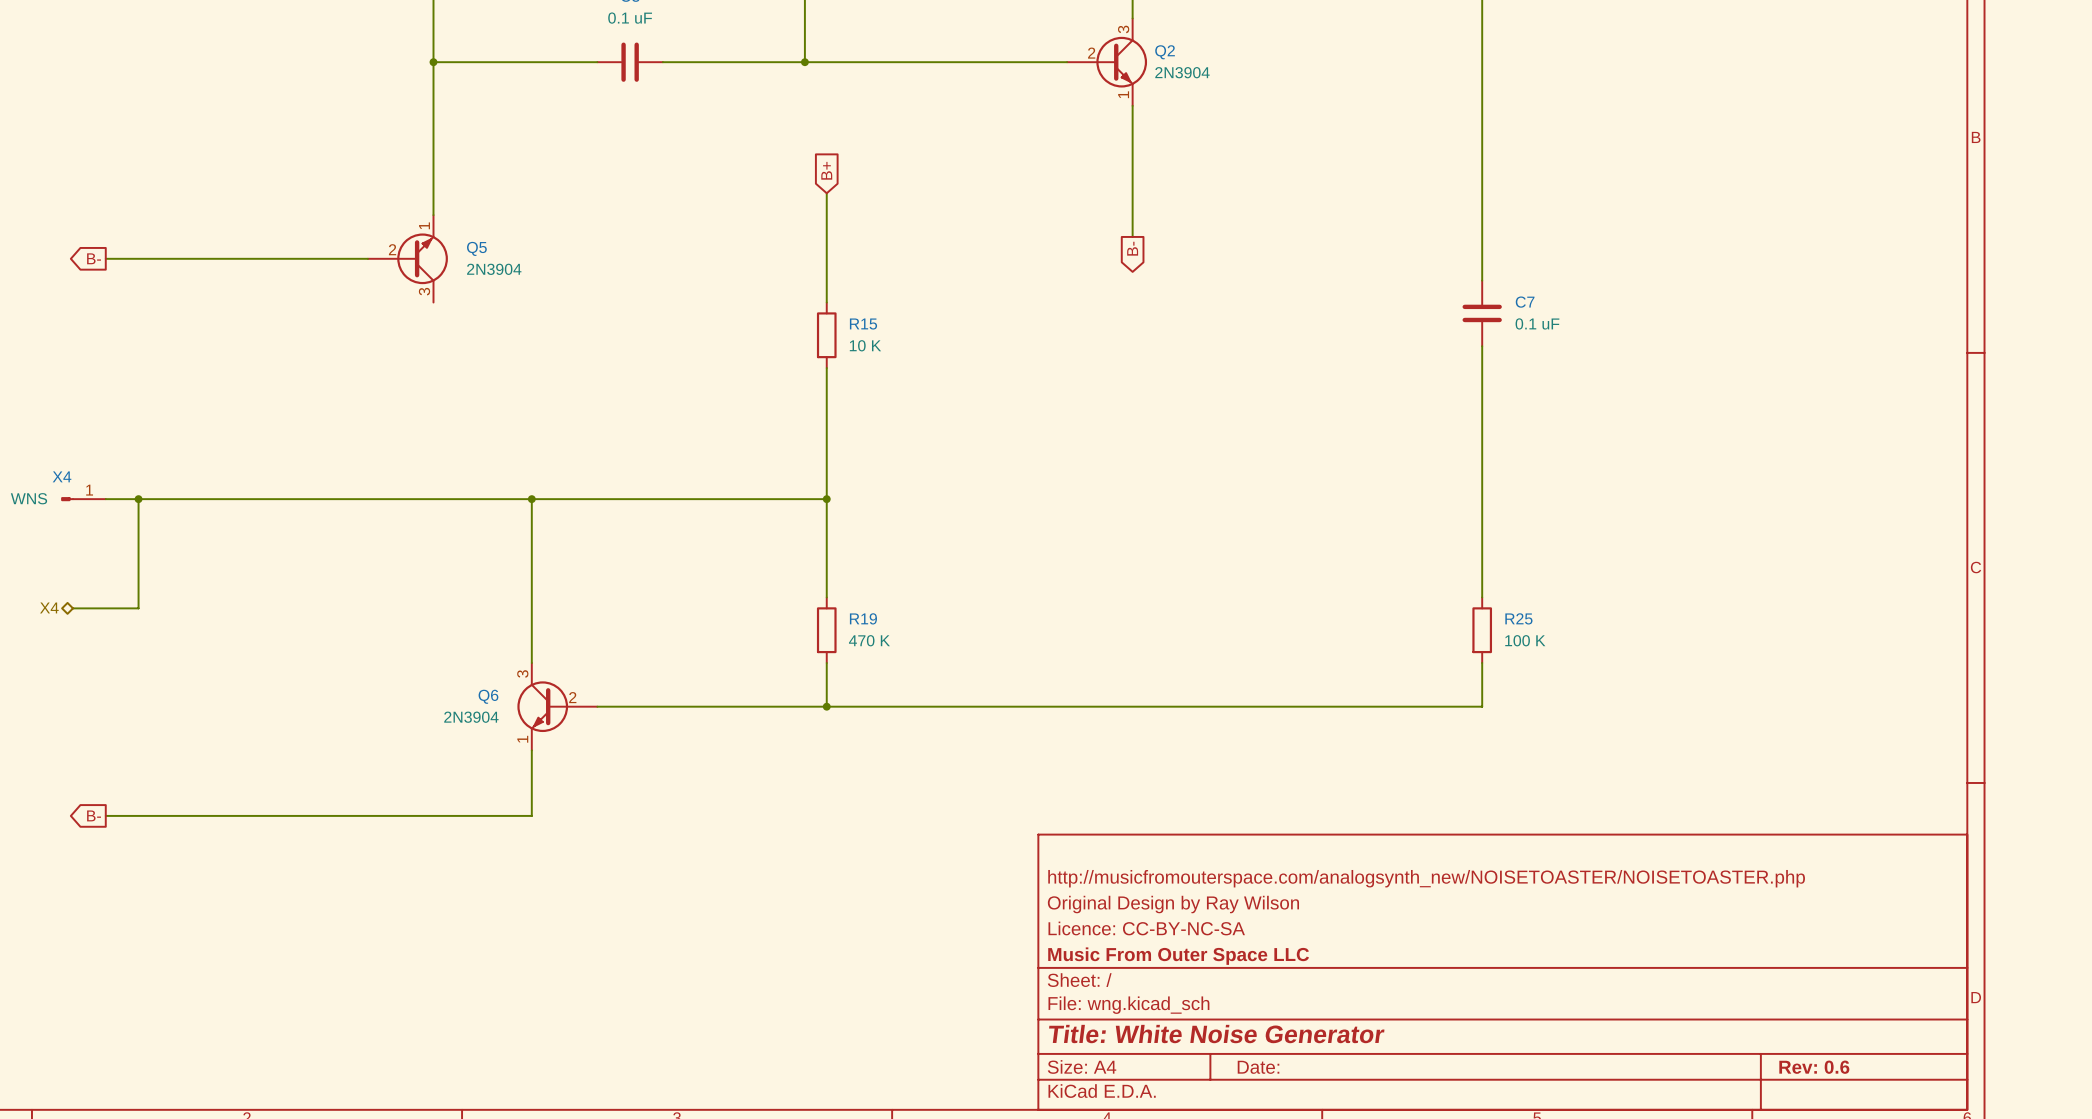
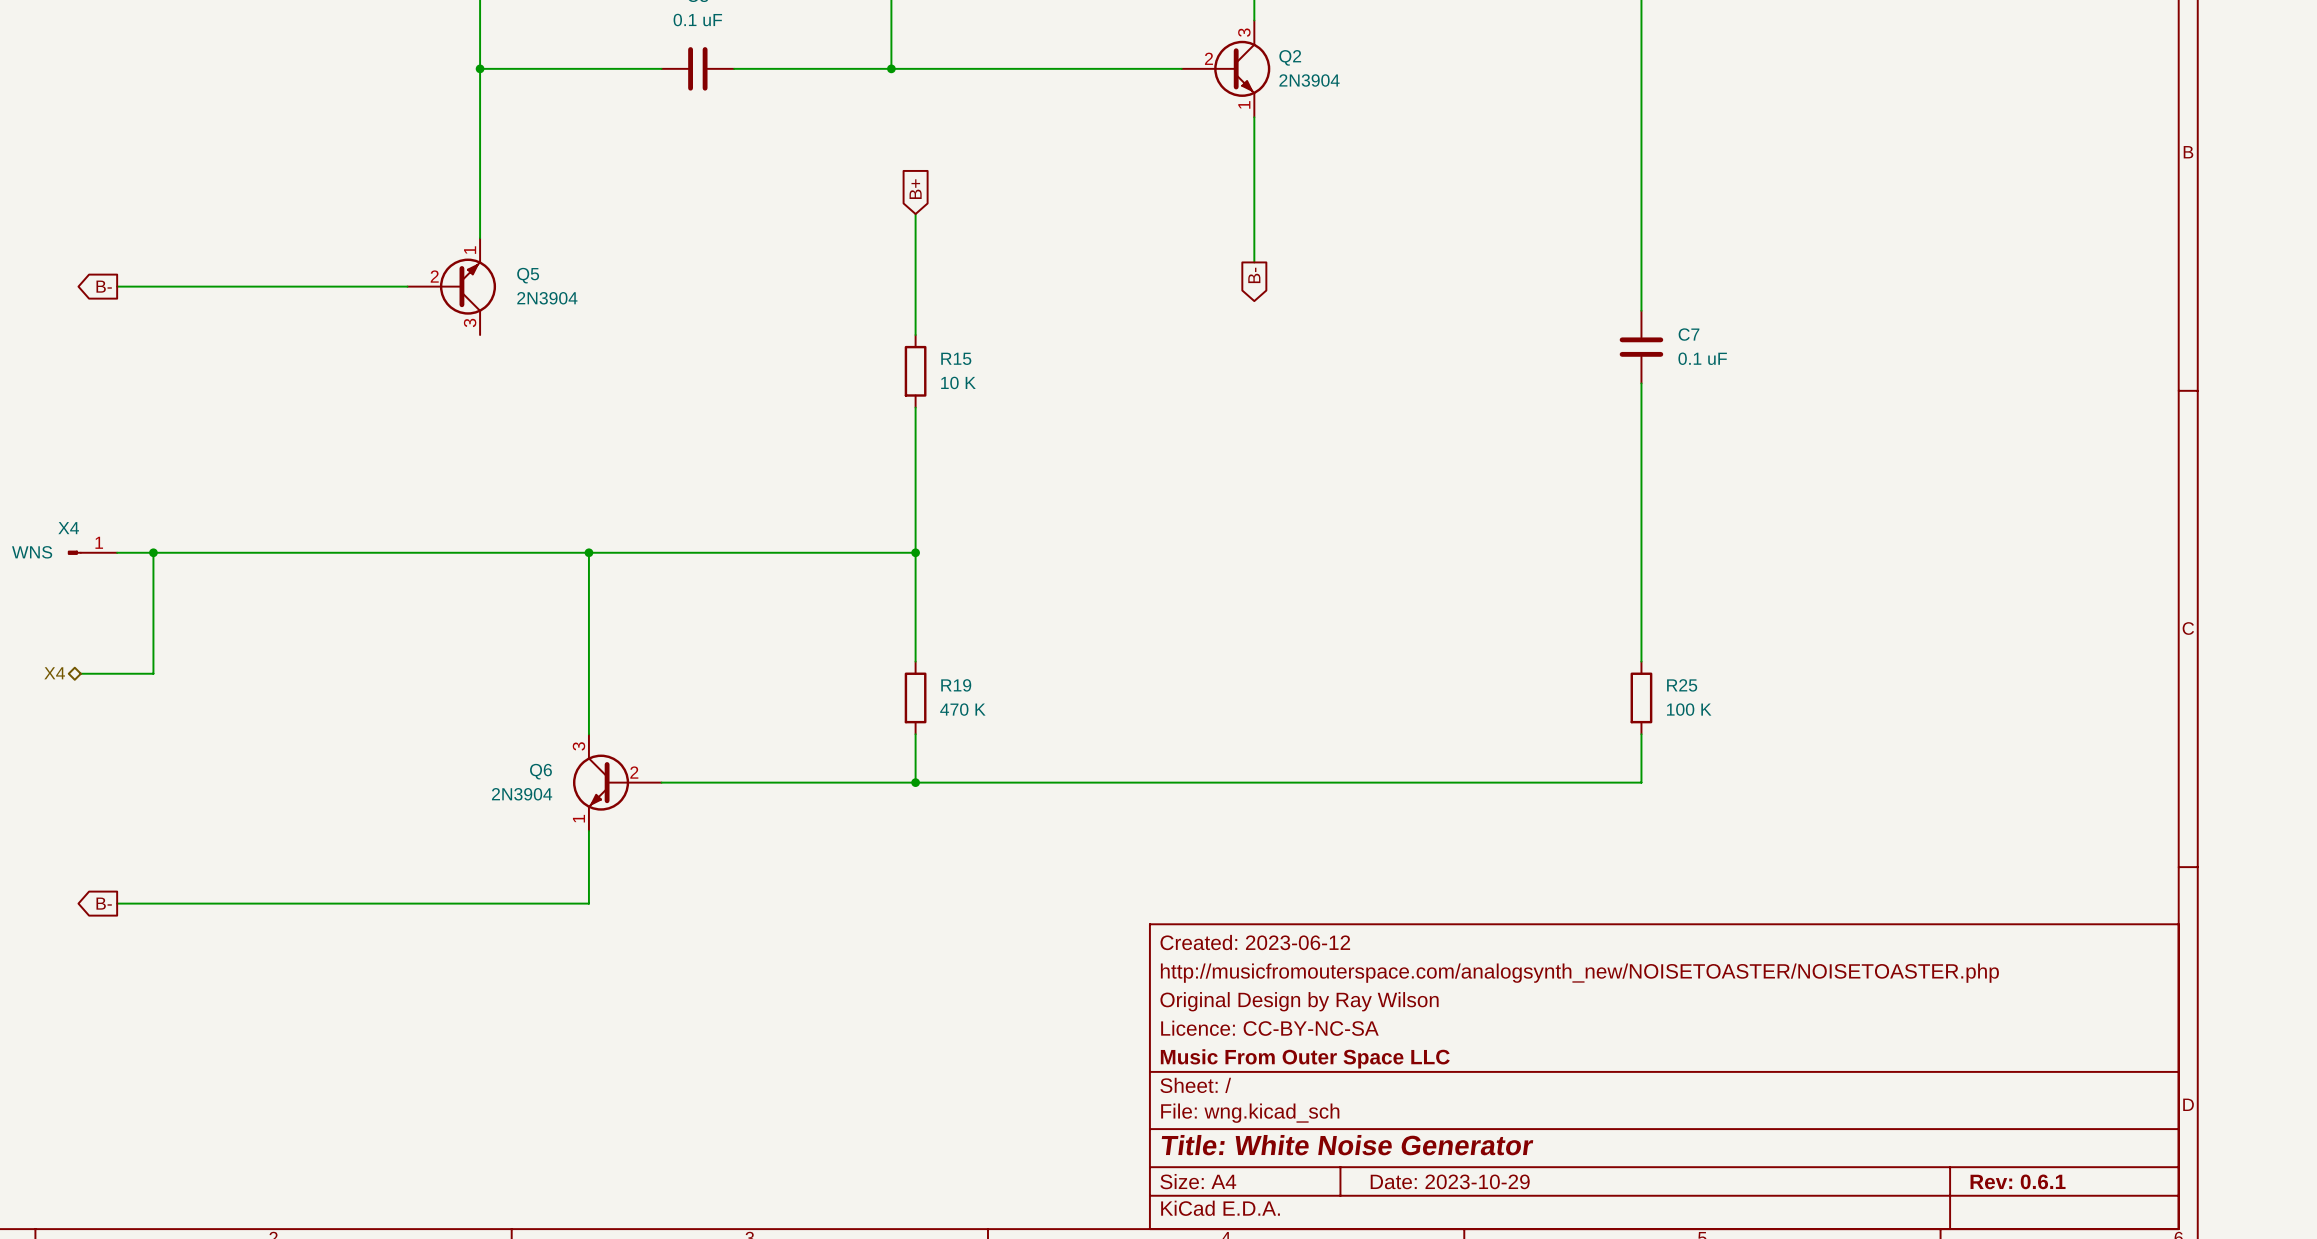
title block: none -> Created: 2023-06-12 (1255, 942)
title block: Date: (1258, 1067) -> Date: 2023-10-29 (1450, 1181)
title block: Rev: 0.6 (1814, 1067) -> Rev: 0.6.1 (2018, 1181)

